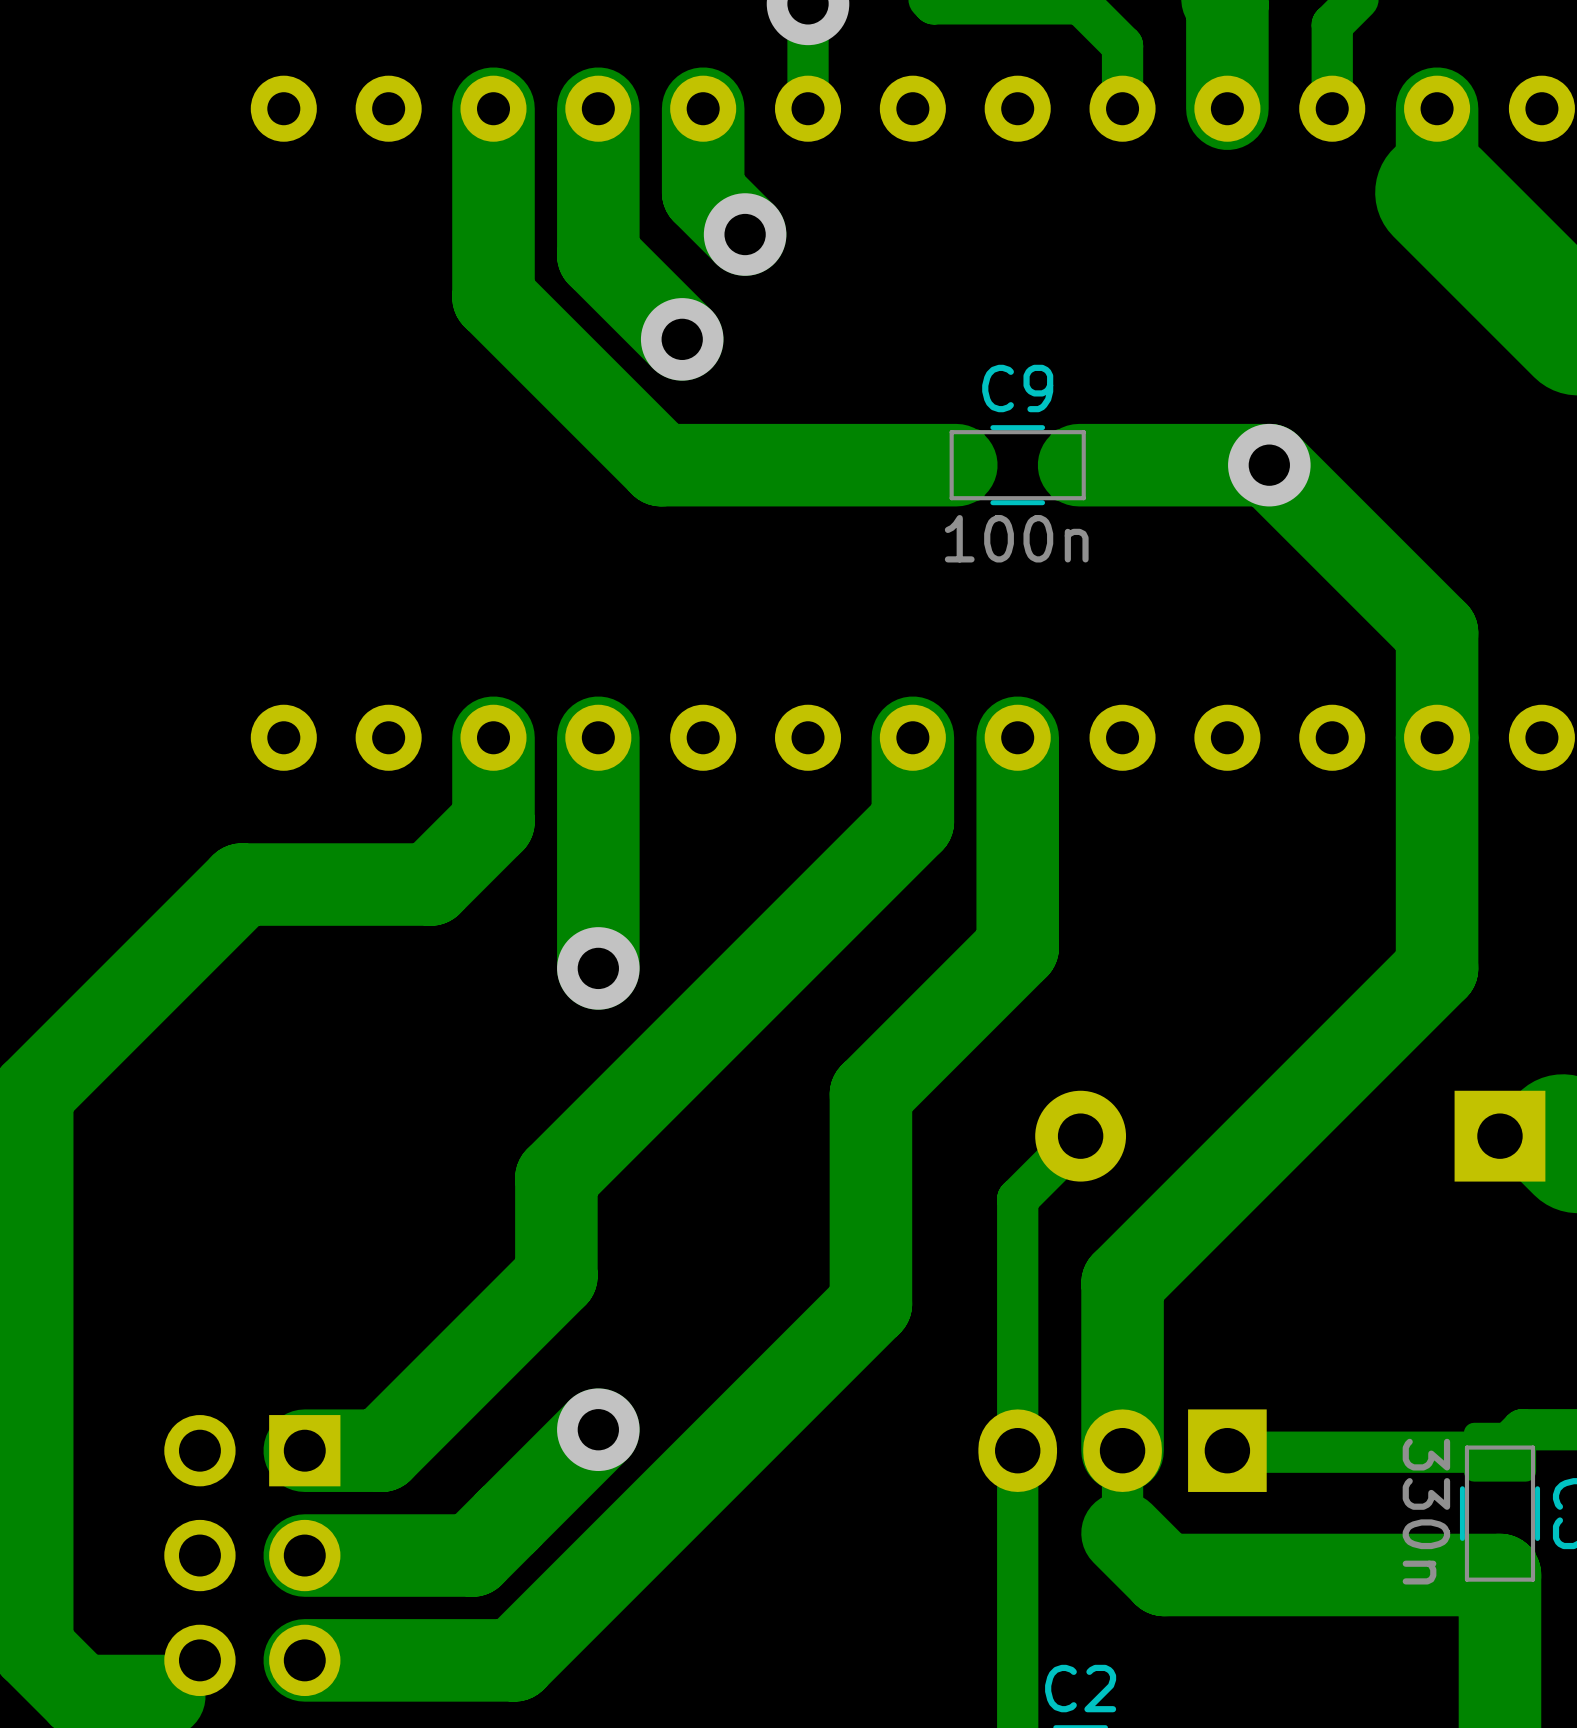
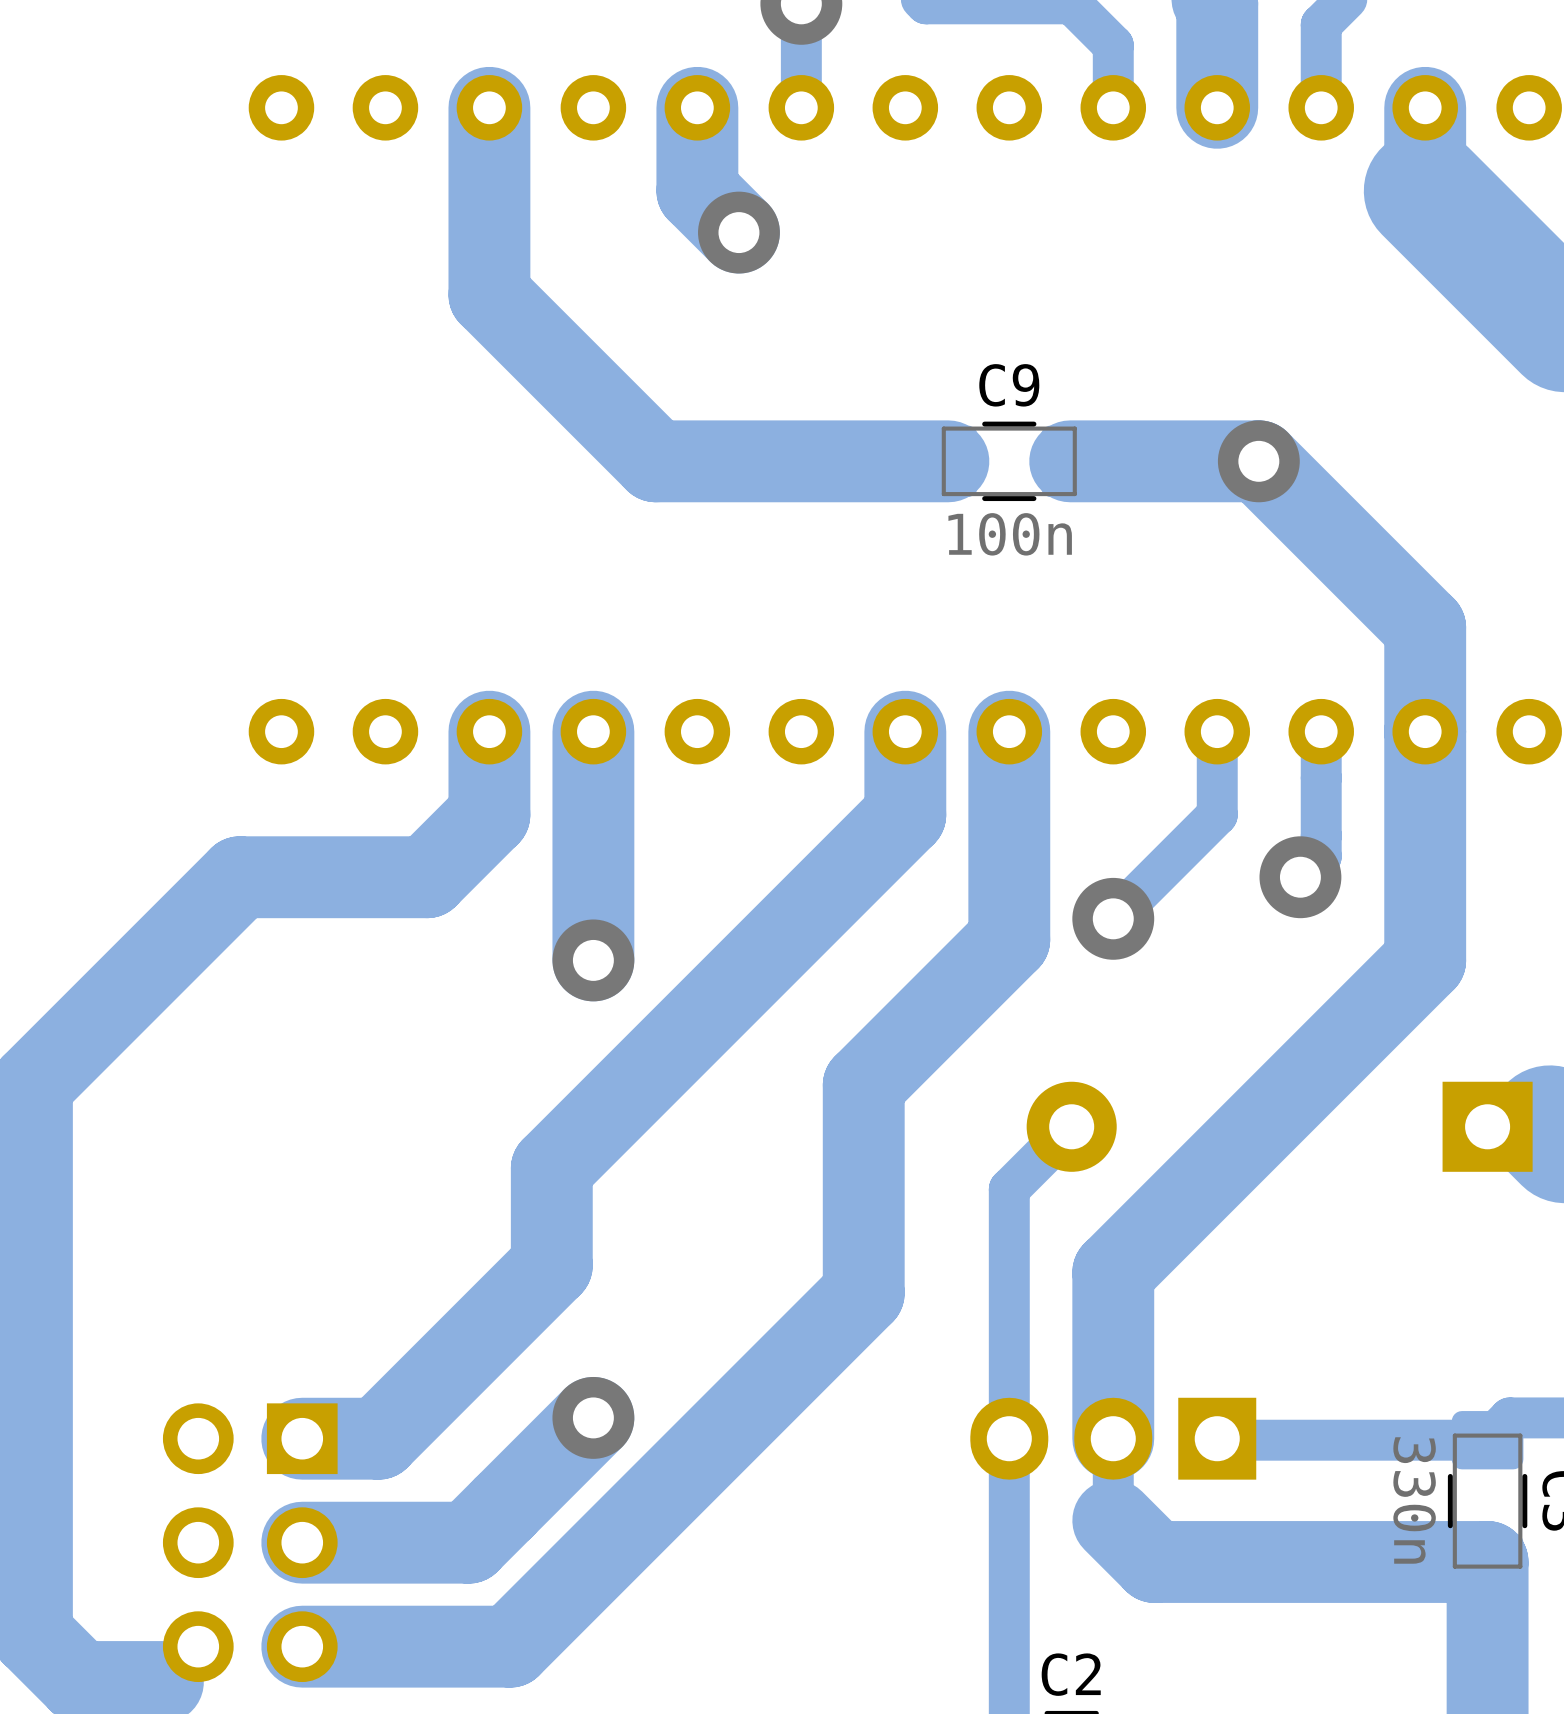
track: (598, 108) (598, 255) (682, 339) -> none
via: (682, 339) -> none
track: none -> (1217, 731) (1217, 814) (1113, 918)
track: none -> (1321, 731) (1321, 856) (1300, 877)
via: none -> (1300, 877)
via: none -> (1113, 918)

